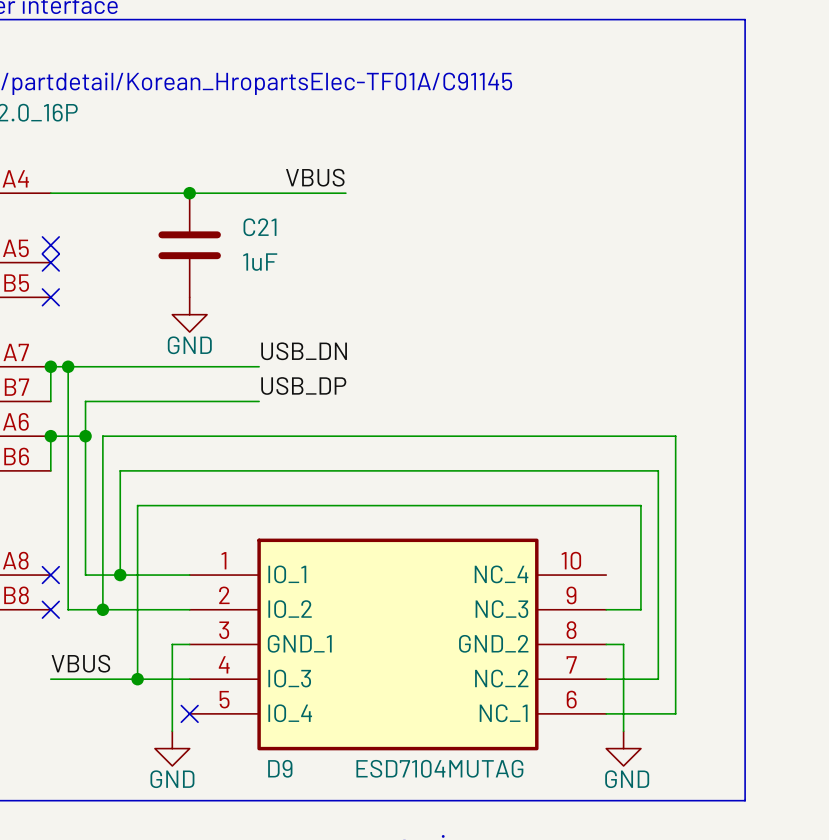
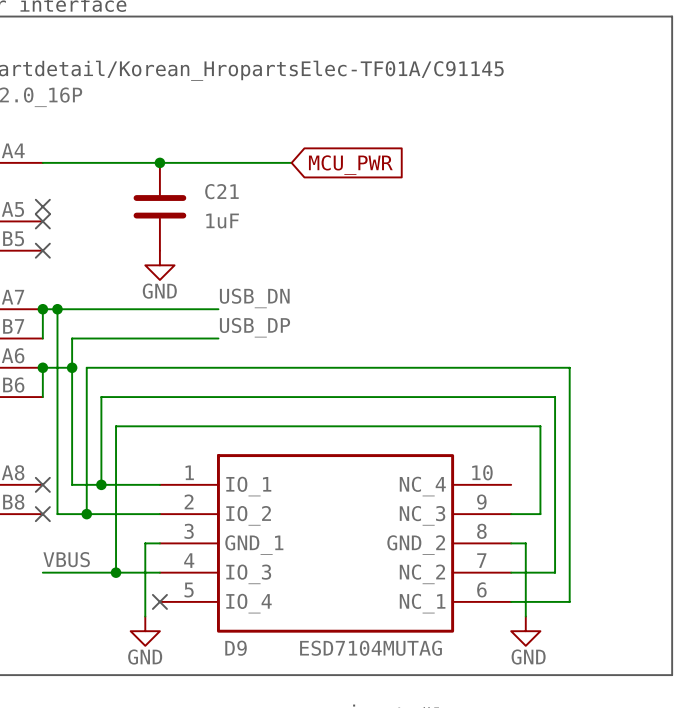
line: (745, 19) (745, 800) -> (628, 16) (672, 16) (672, 675) (628, 675)
label: VBUS (315, 177) -> none
global label: none -> MCU_PWR (350, 165)

